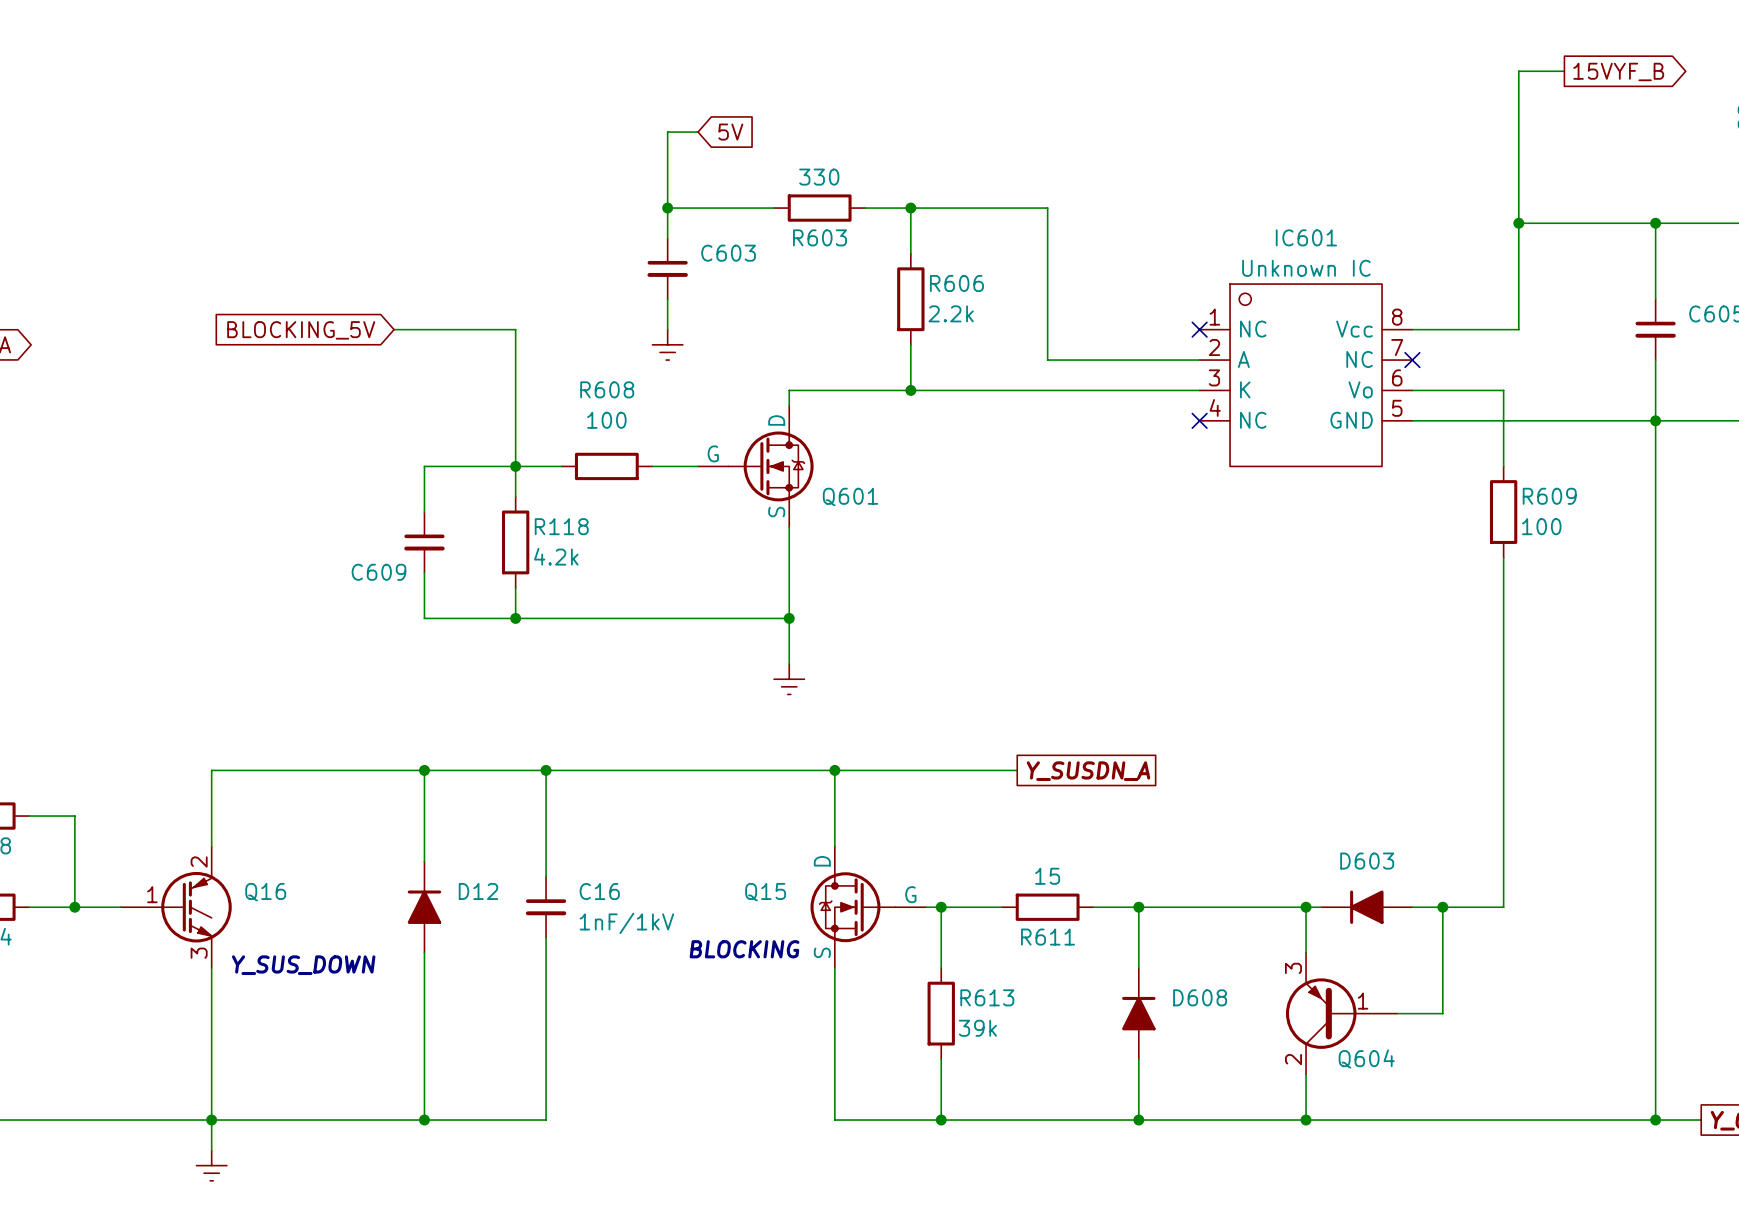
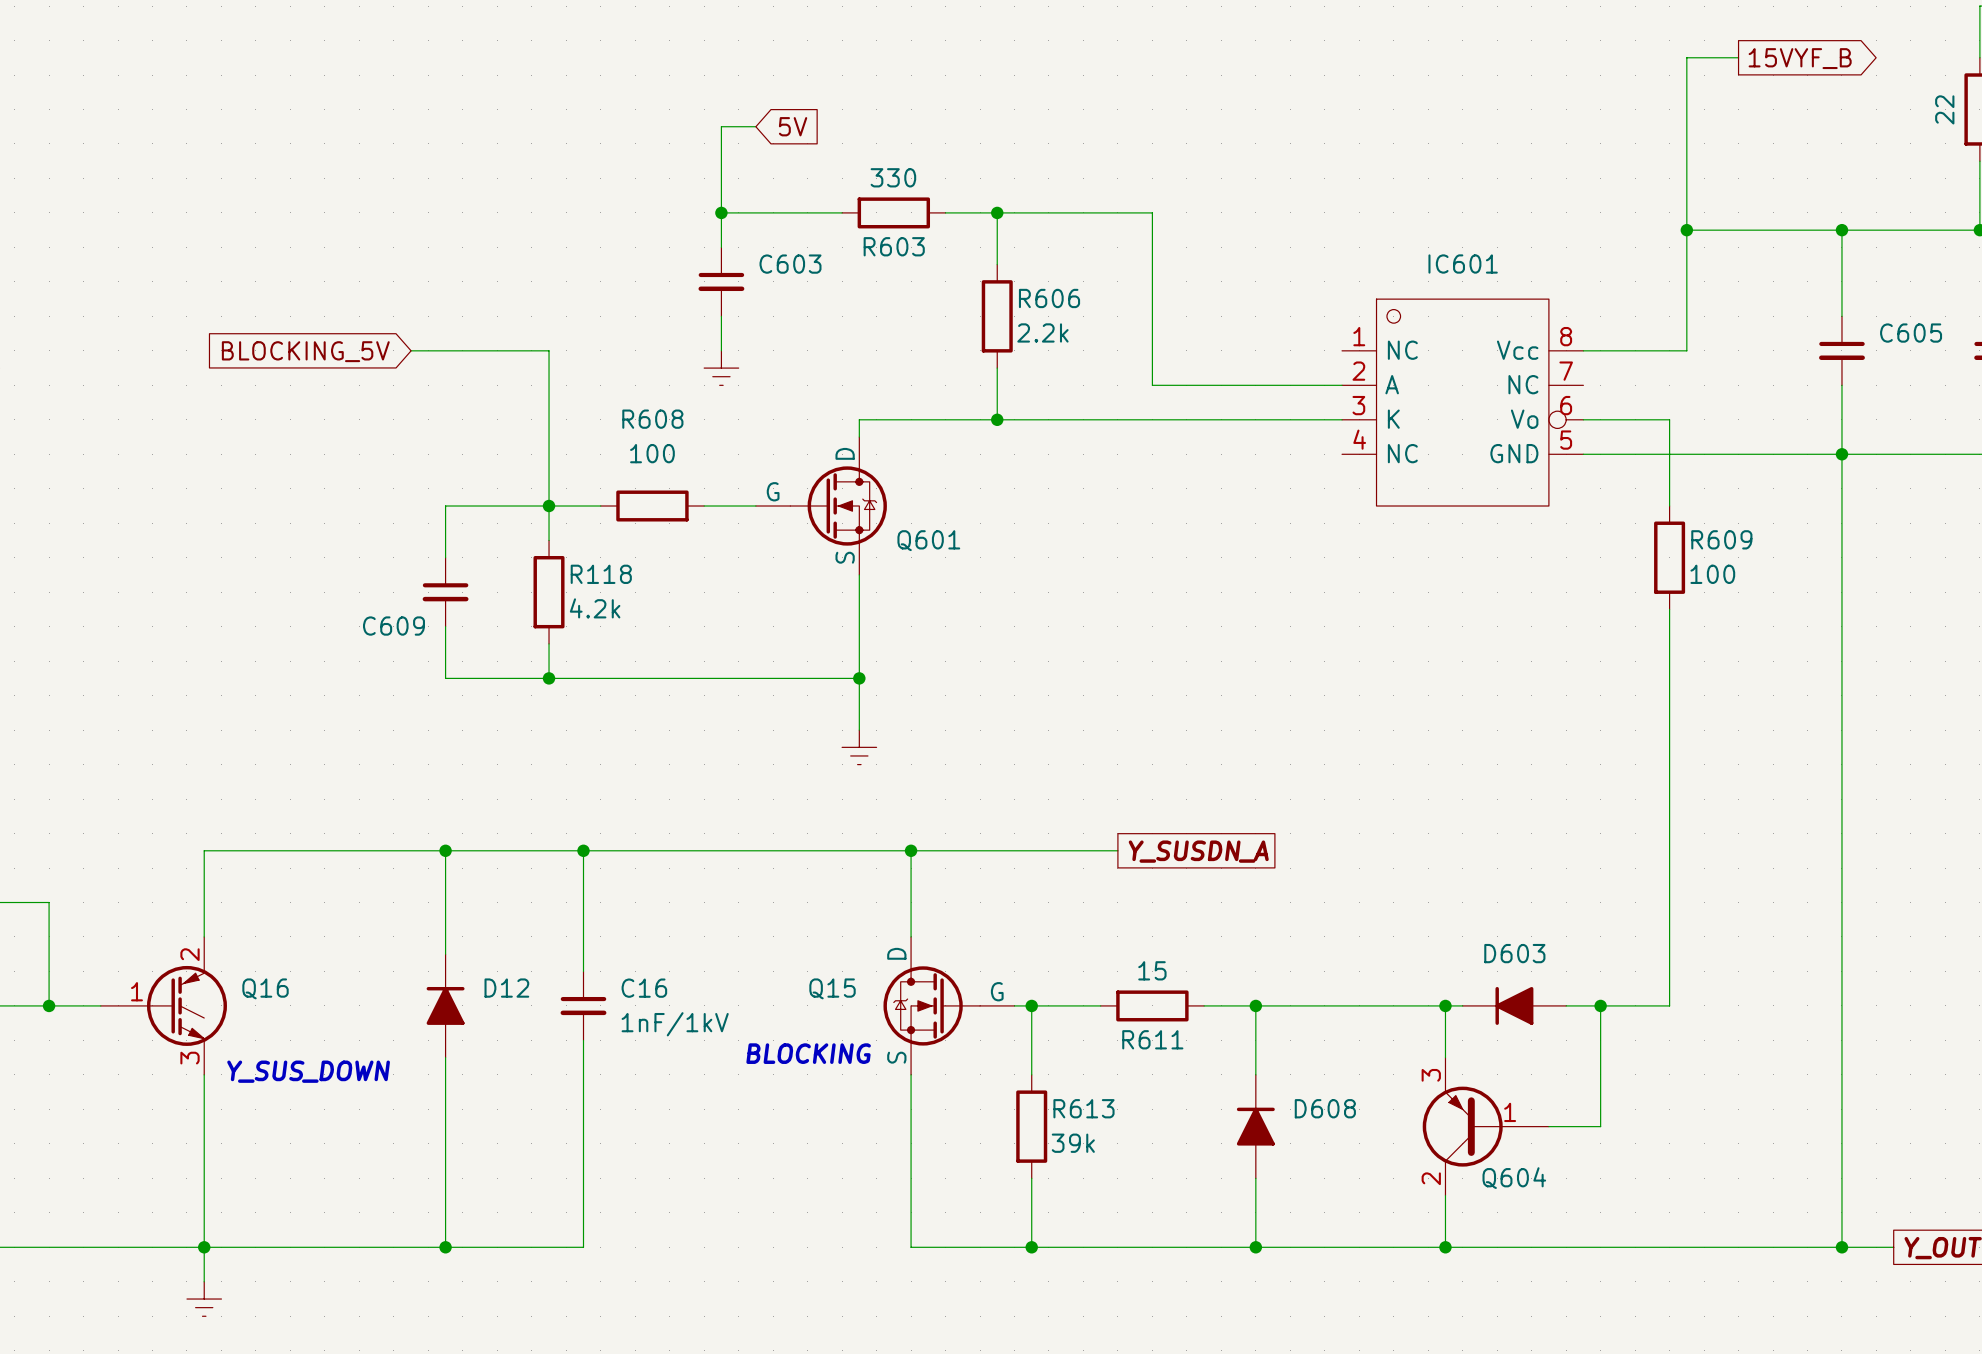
IC601 value: Unknown IC (1306, 268) -> none
IC601 symbol: [1199, 284, 1413, 467] -> [1342, 299, 1584, 507]
no-connect mark: (1199, 329) -> none
no-connect mark: (1412, 360) -> none
no-connect mark: (1199, 420) -> none

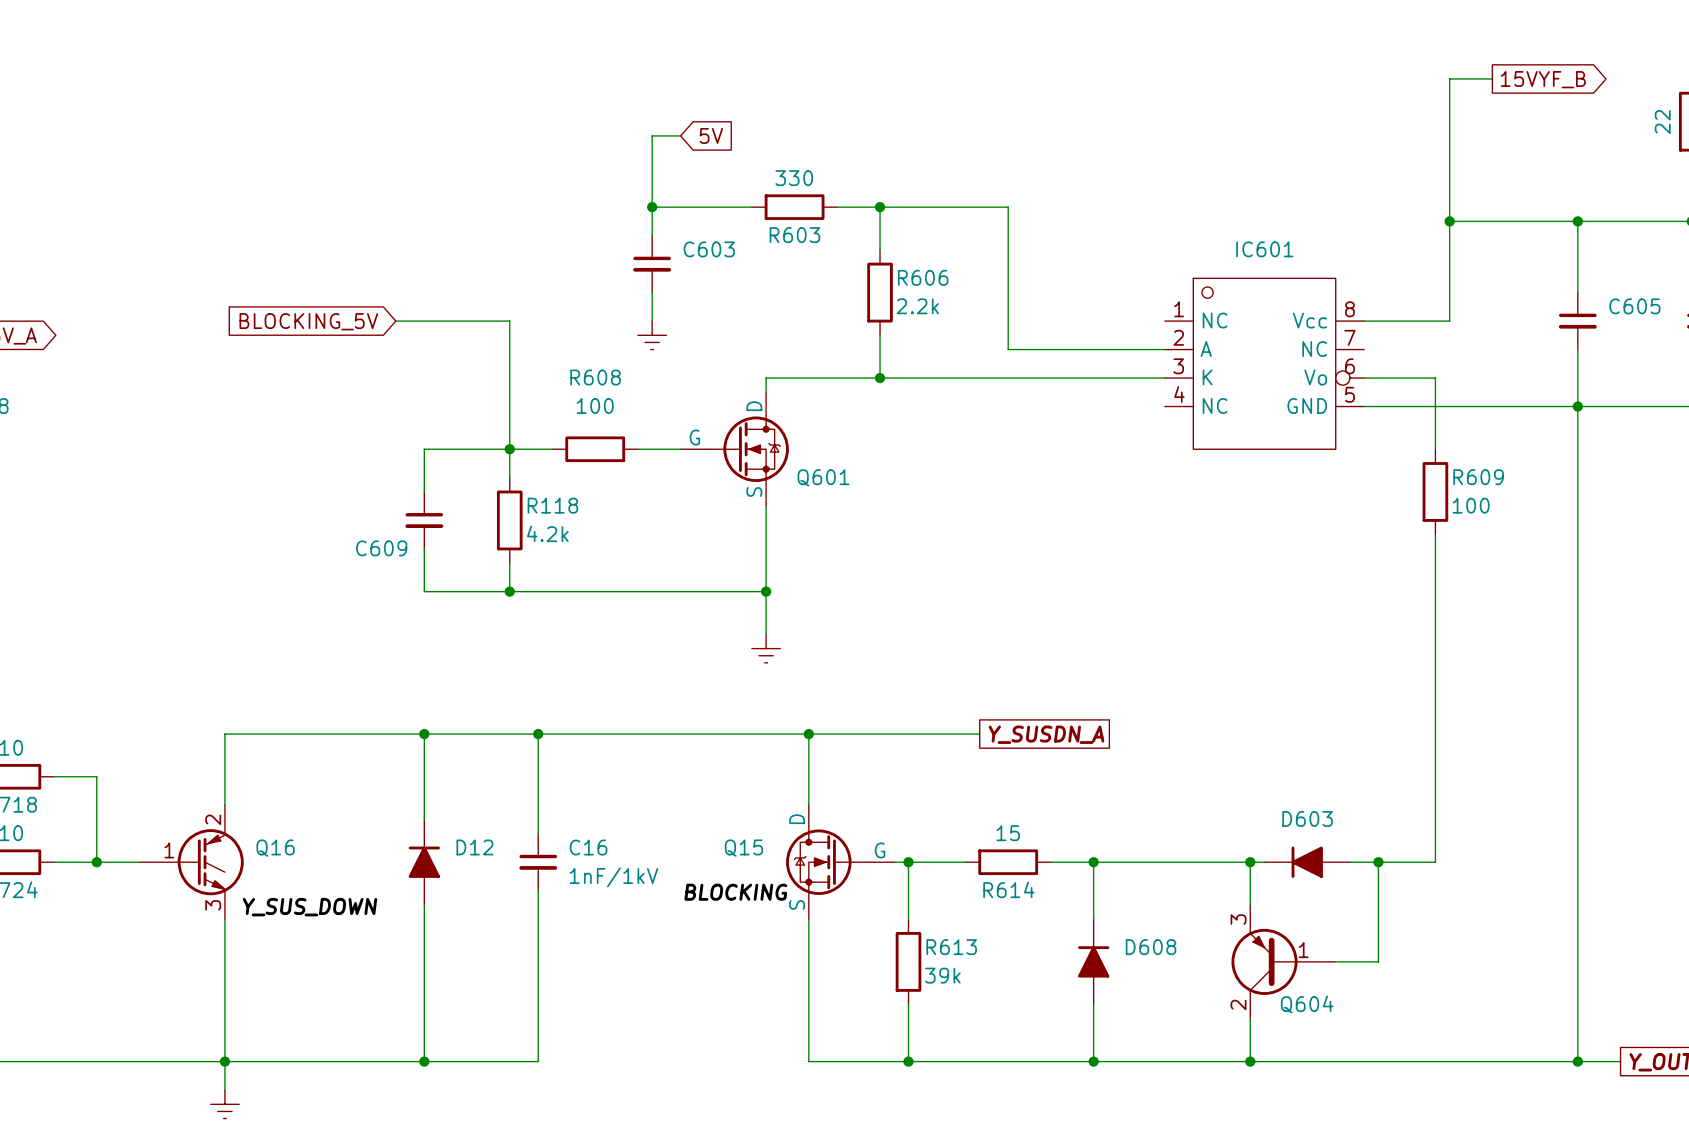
R611 name: R611 (1152, 1039) -> R614 (1008, 889)
label: none -> BLOCKING (735, 892)
text: BLOCKING (808, 1053) -> none
label: none -> Y_SUS_DOWN (309, 907)
text: Y_SUS_DOWN (308, 1071) -> none

